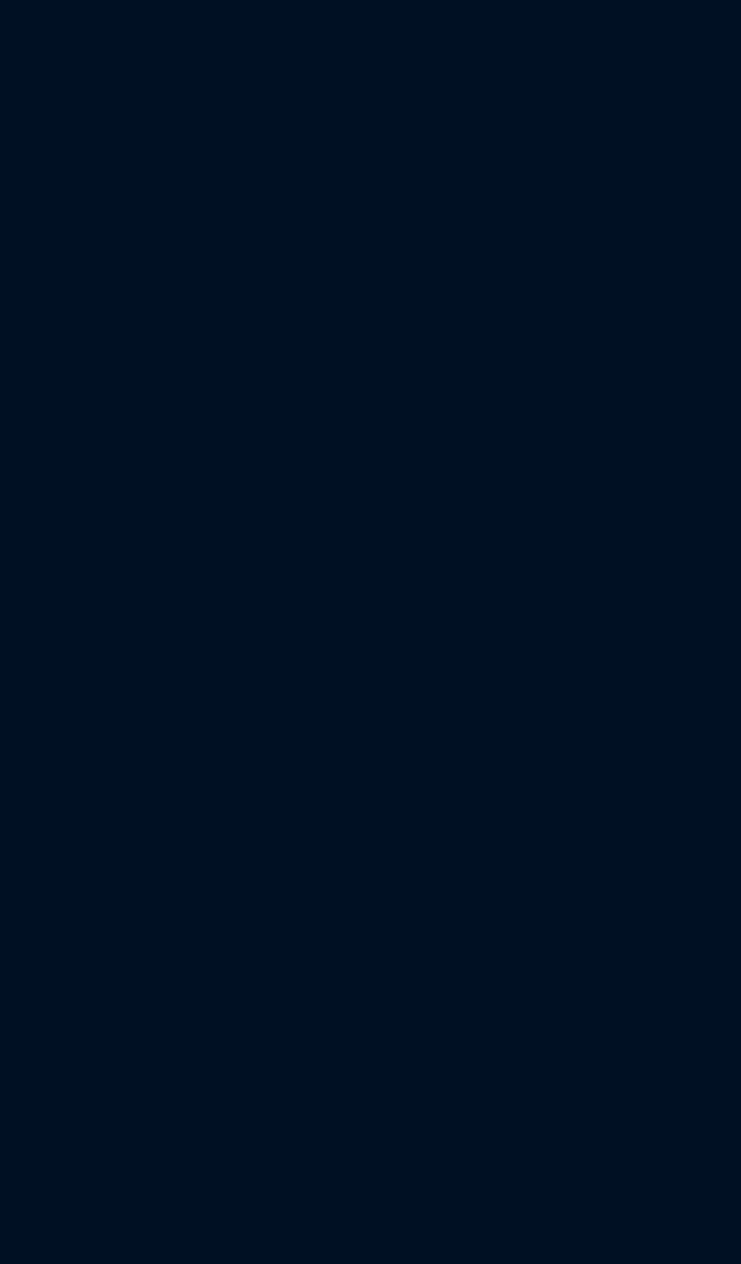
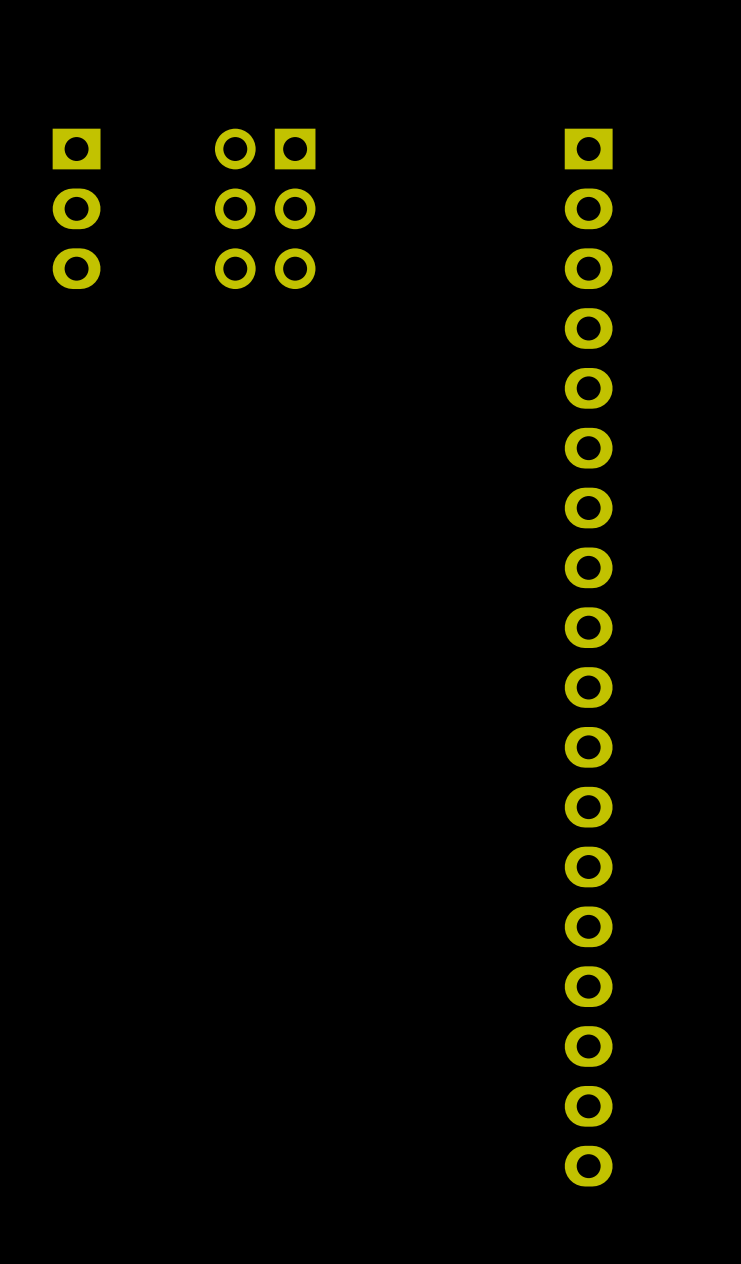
part: none -> (76, 208)
part: none -> (265, 208)
part: none -> (588, 657)

